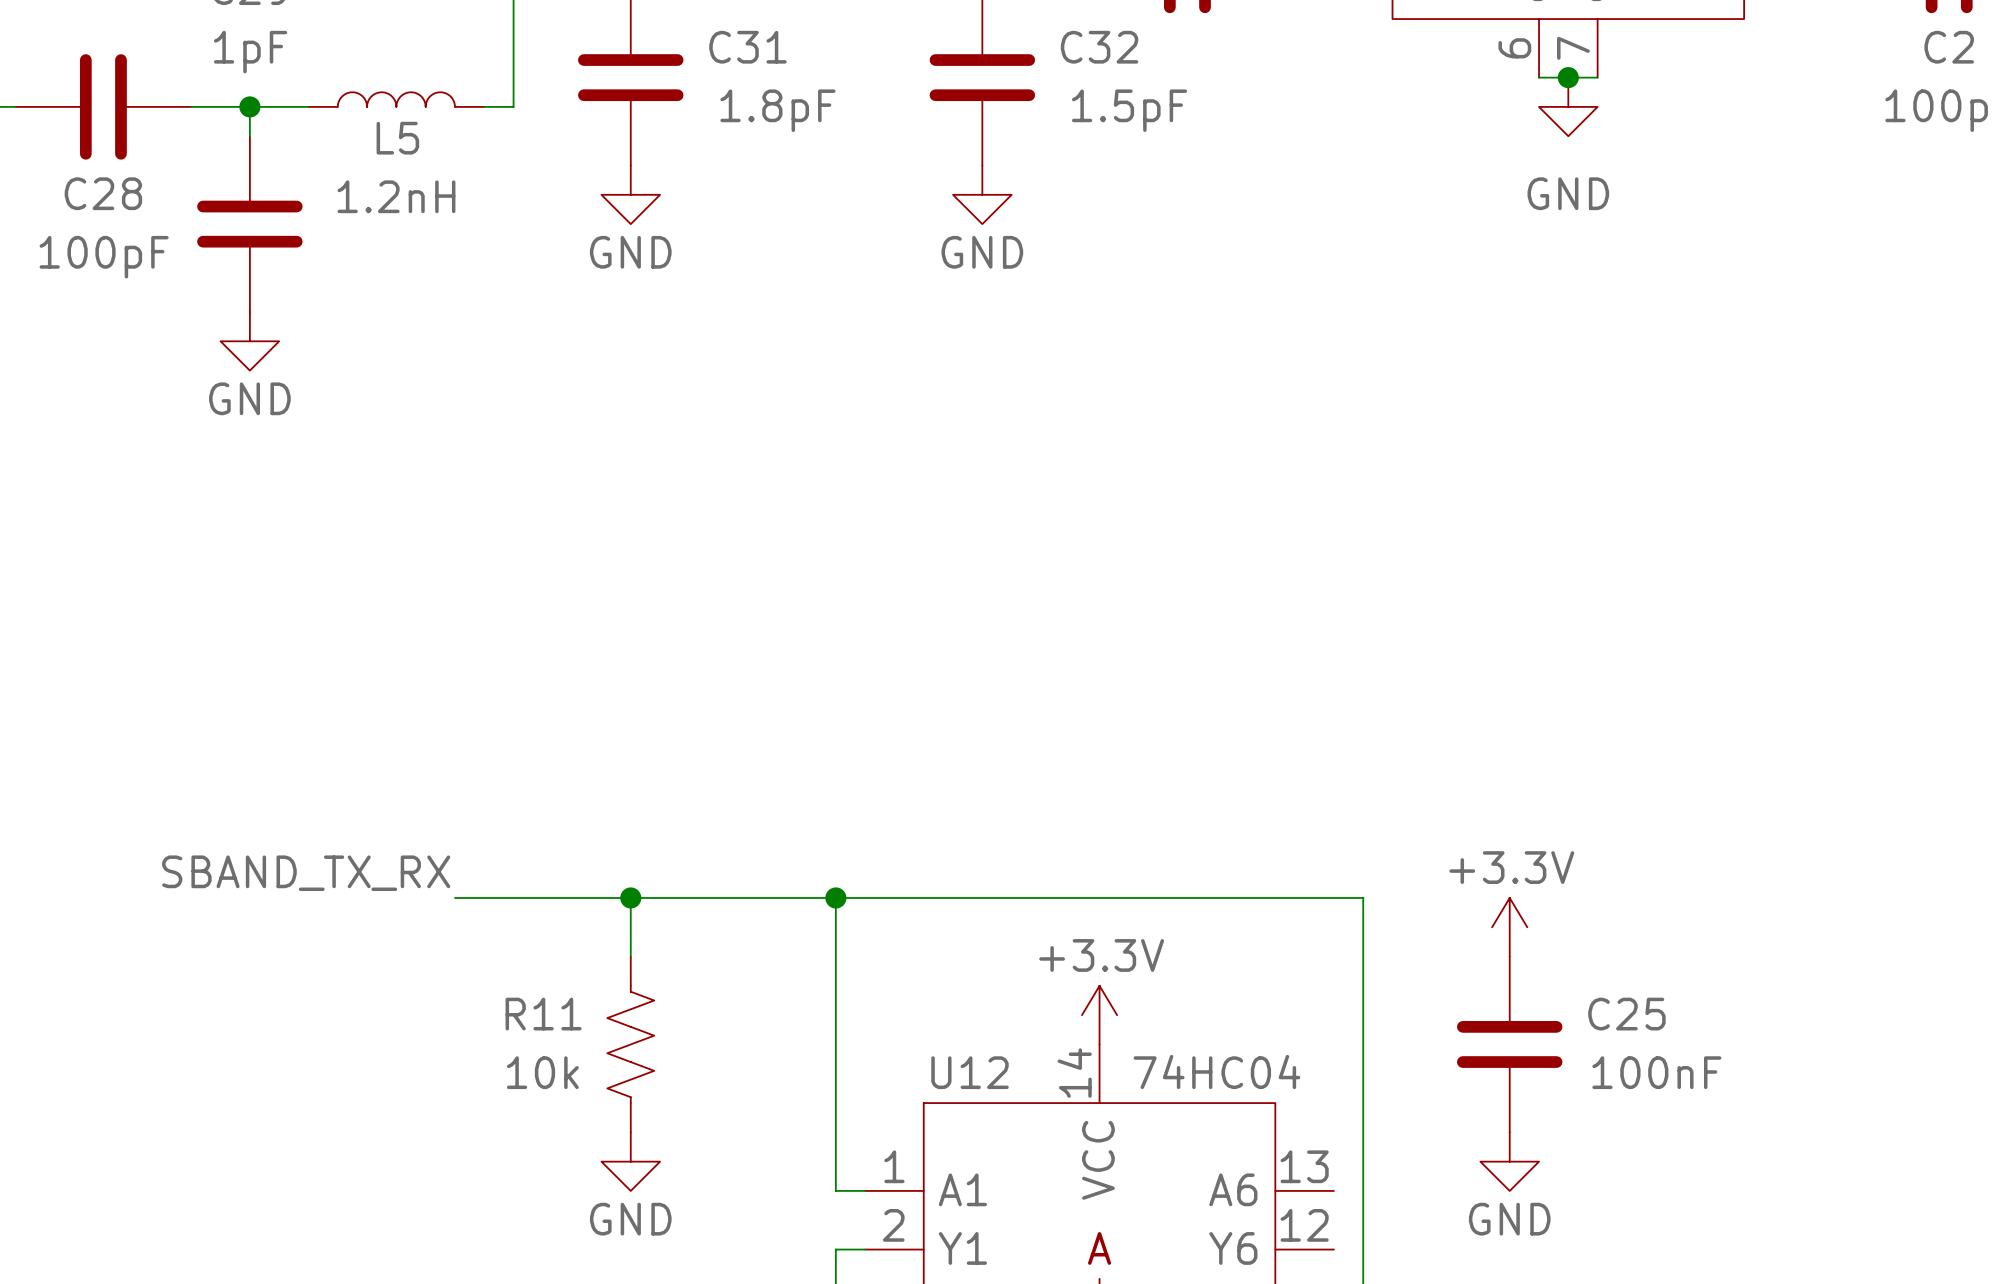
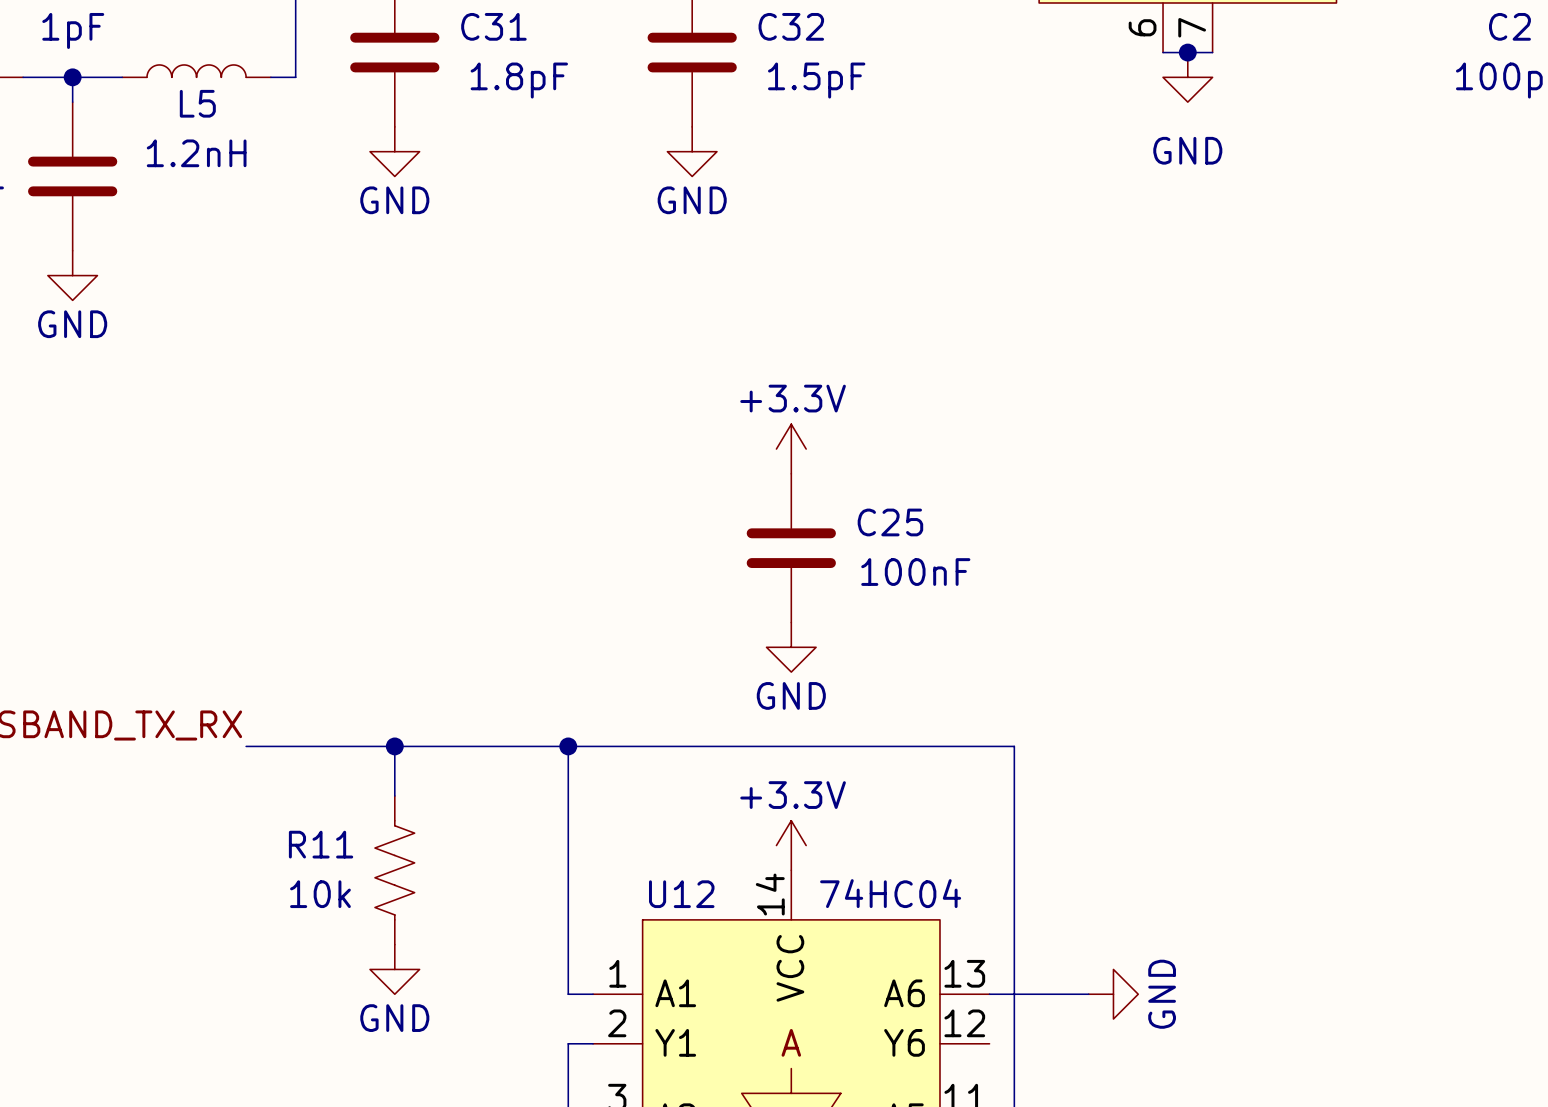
power symbol: none -> GND (791, 647)
power symbol position: +3.3V (1509, 927) -> +3.3V (791, 449)
C25 position: (1509, 1044) -> (791, 548)
power symbol rotation: 0° (1509, 1161) -> 90° counterclockwise (1113, 994)
power symbol position: GND (1509, 1161) -> GND (1113, 994)
wire: none -> (989, 994) (1088, 994)

